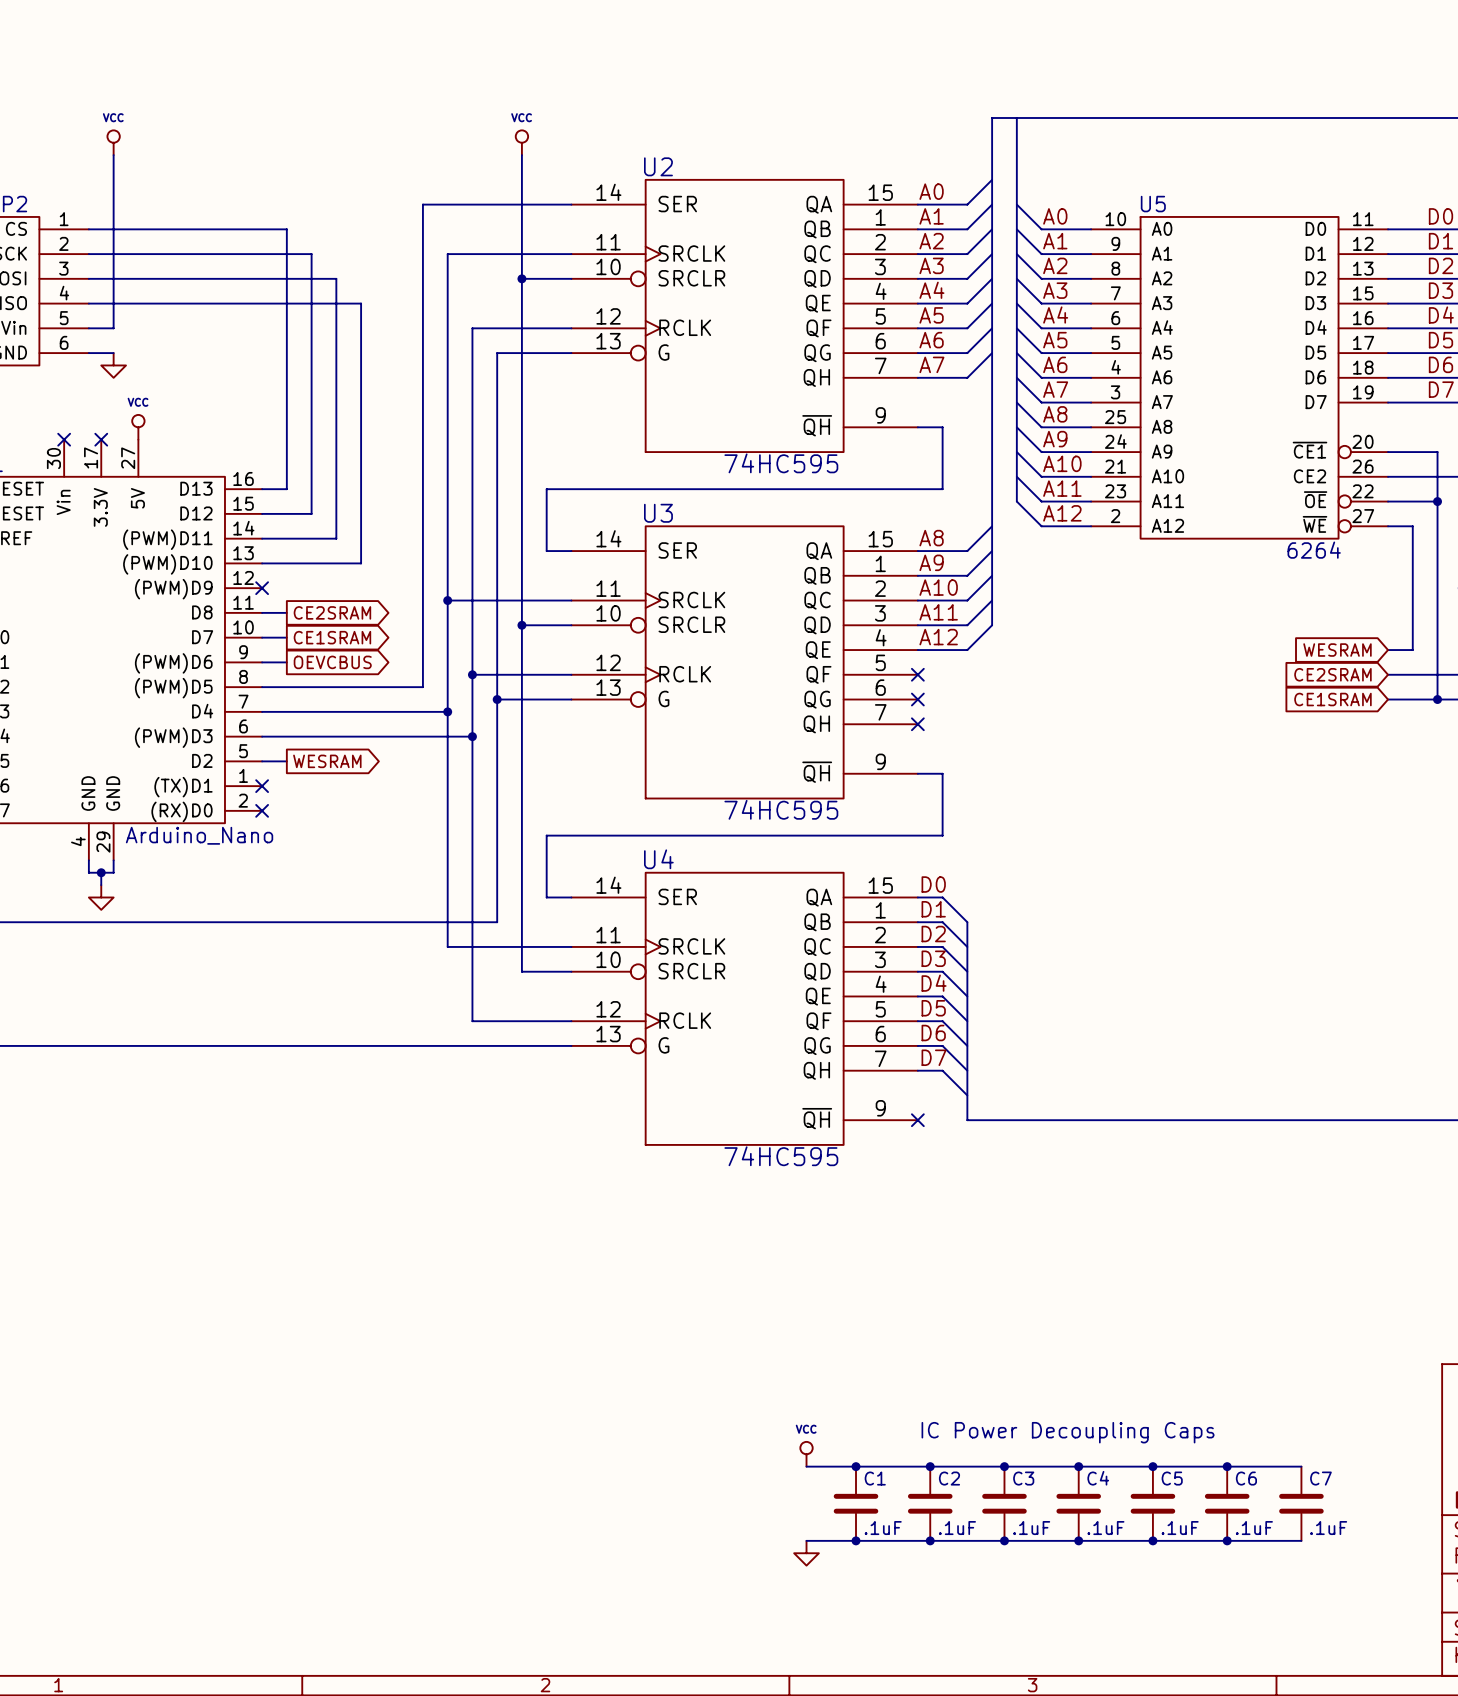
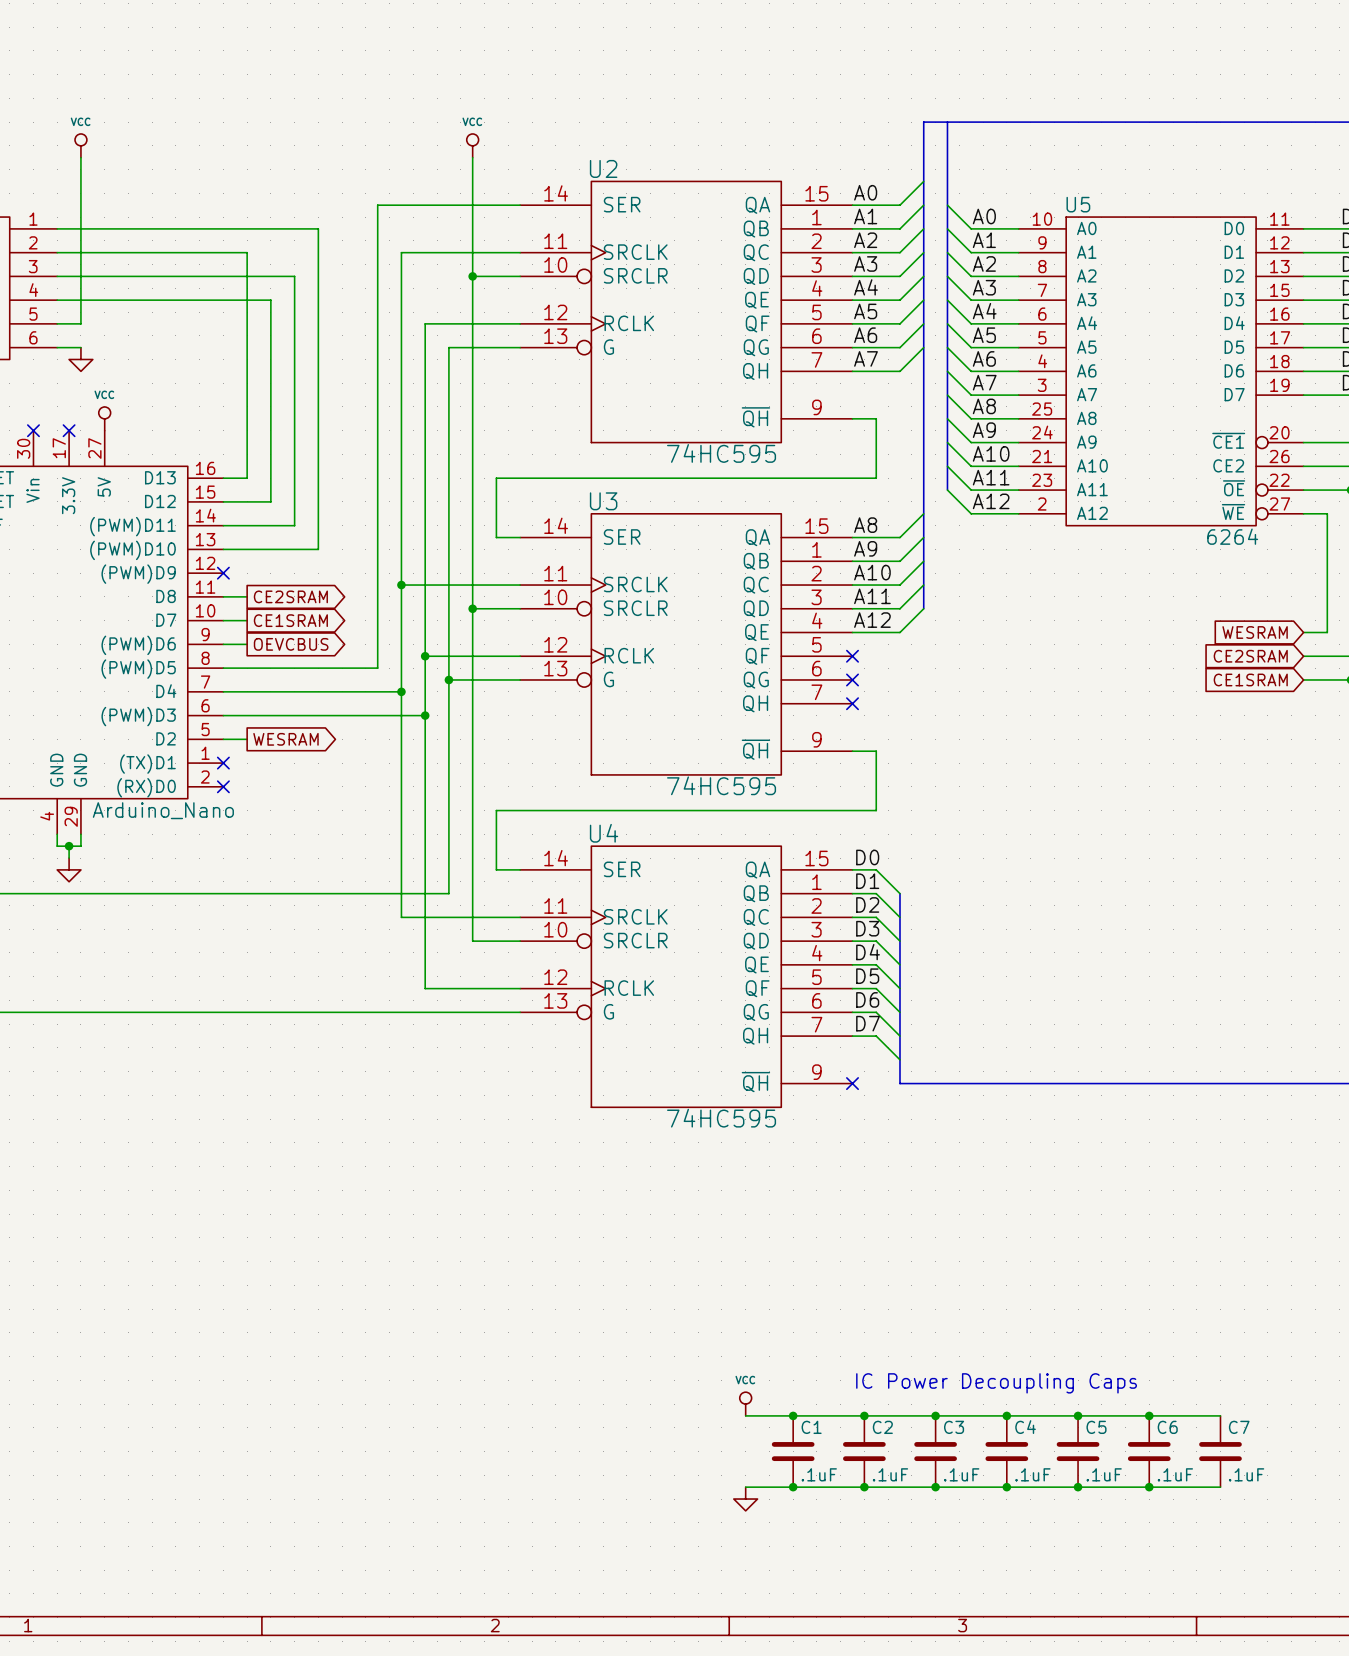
wire: (286, 229) (286, 254) (311, 254) (311, 303) (361, 303) -> (247, 228) (318, 228) (318, 300)

